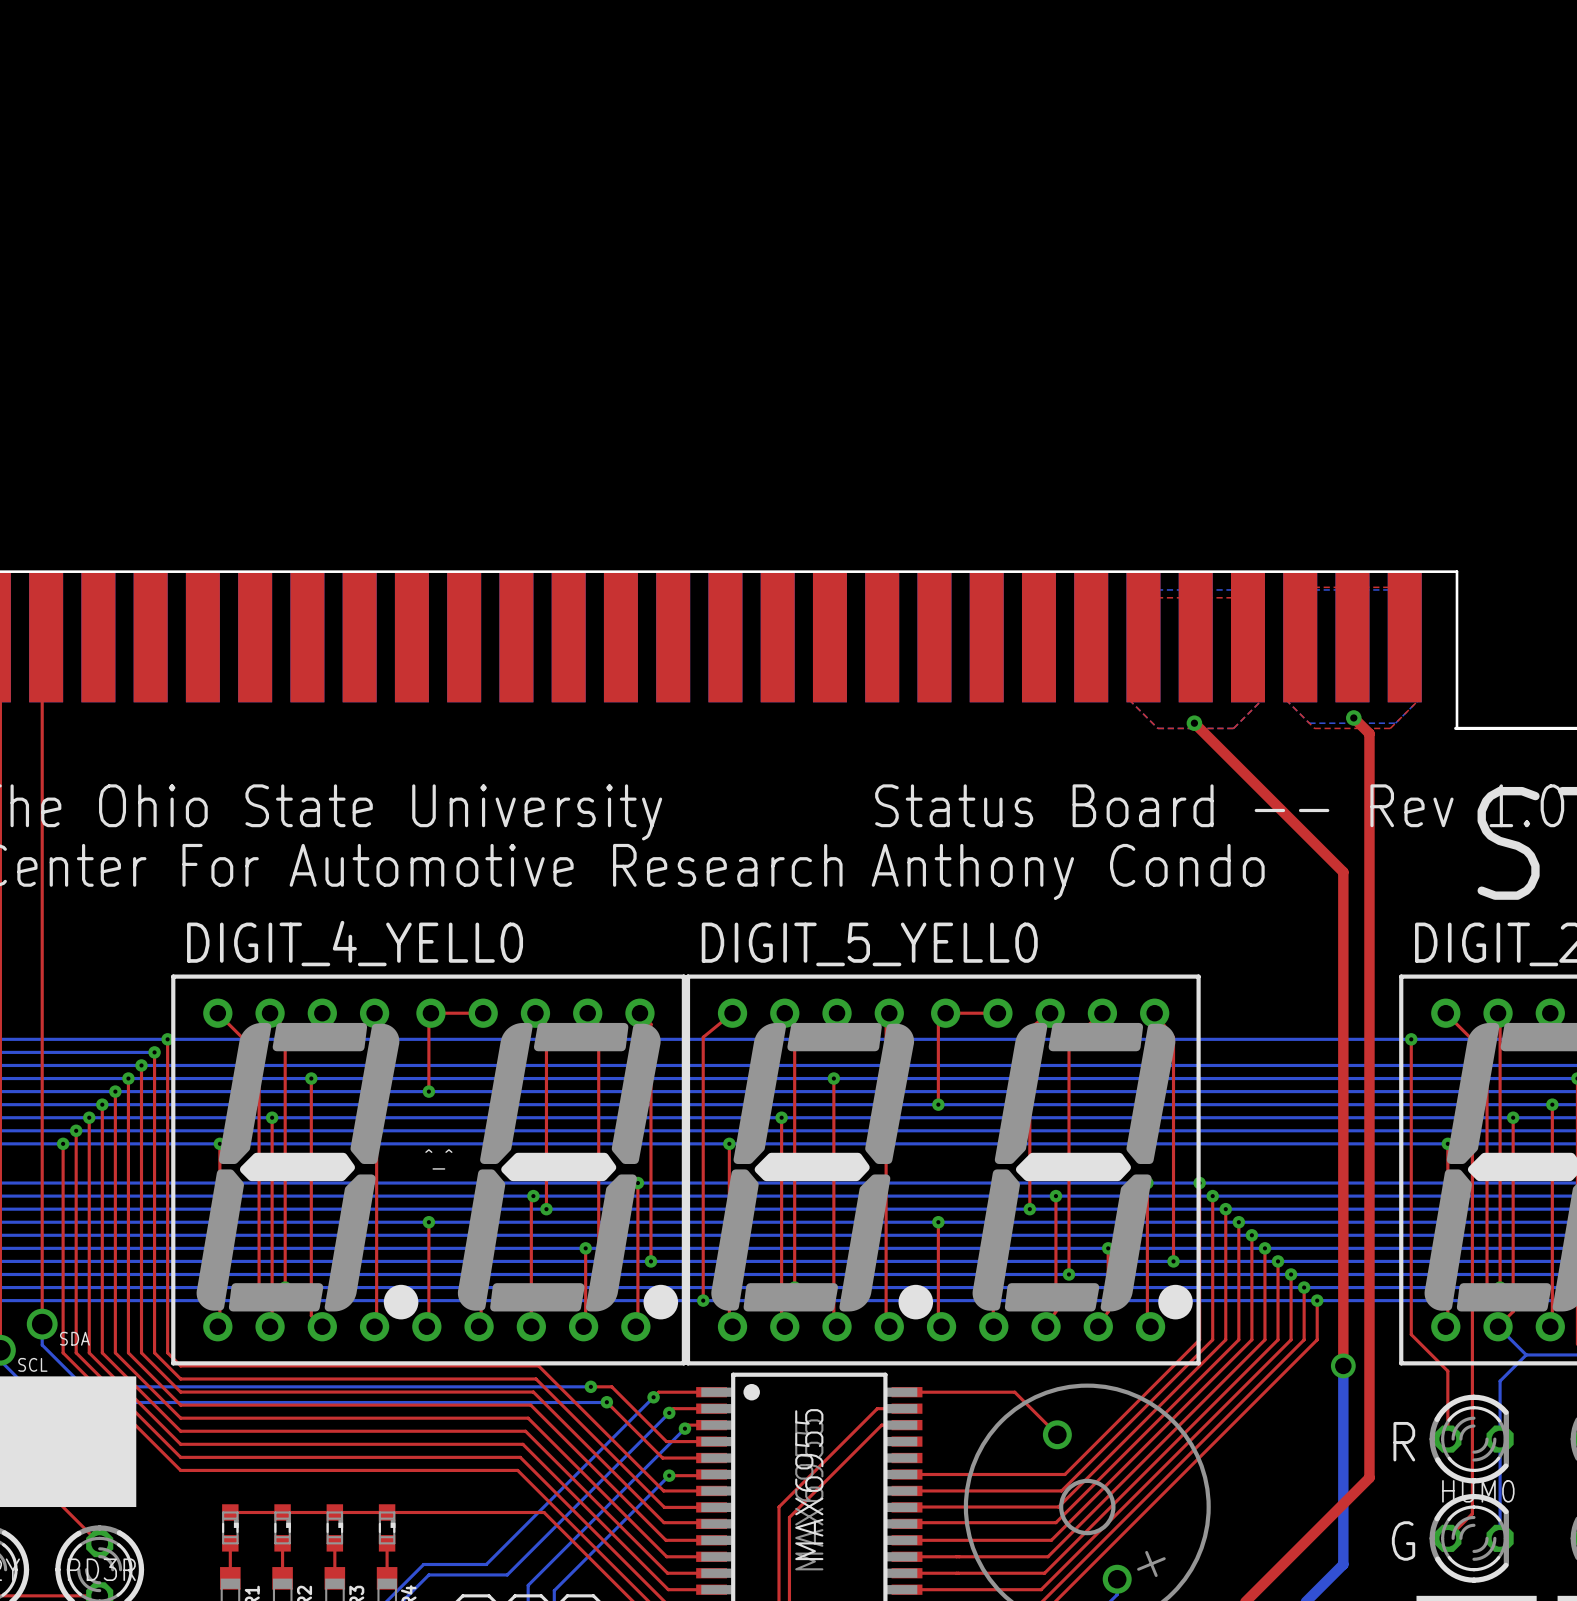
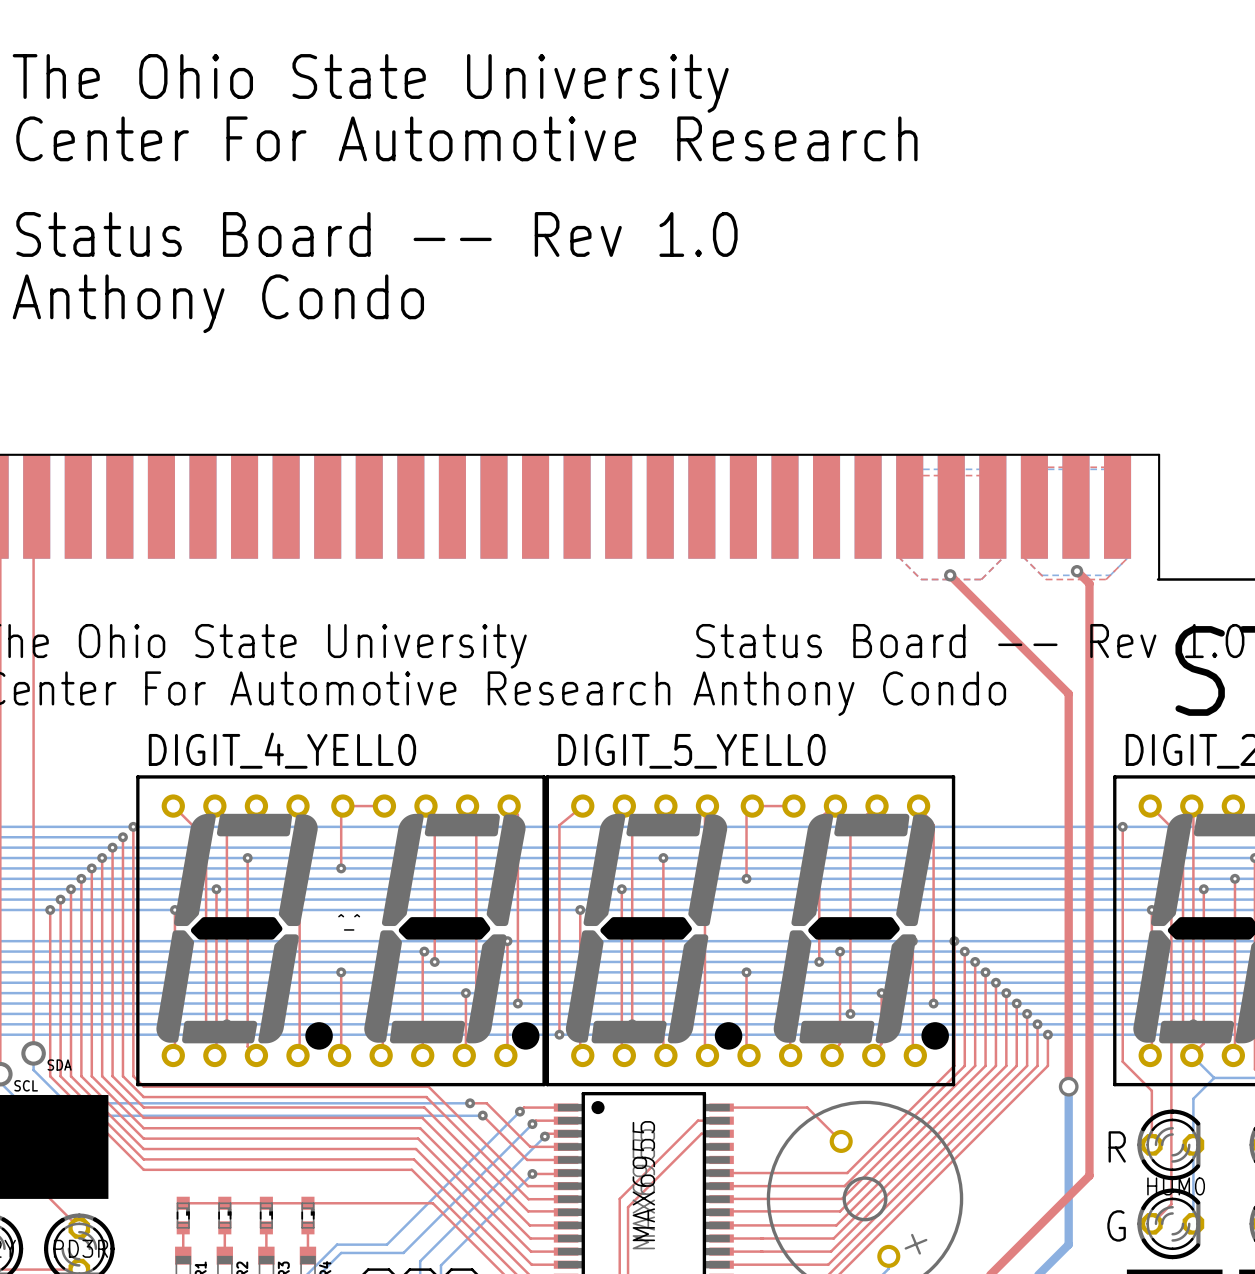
text: none -> The Ohio State University (370, 83)
text: none -> Center For Automotive Research (466, 138)
text: none -> Status Board -- Rev 1.0 (376, 234)
text: none -> Anthony Condo (218, 303)

